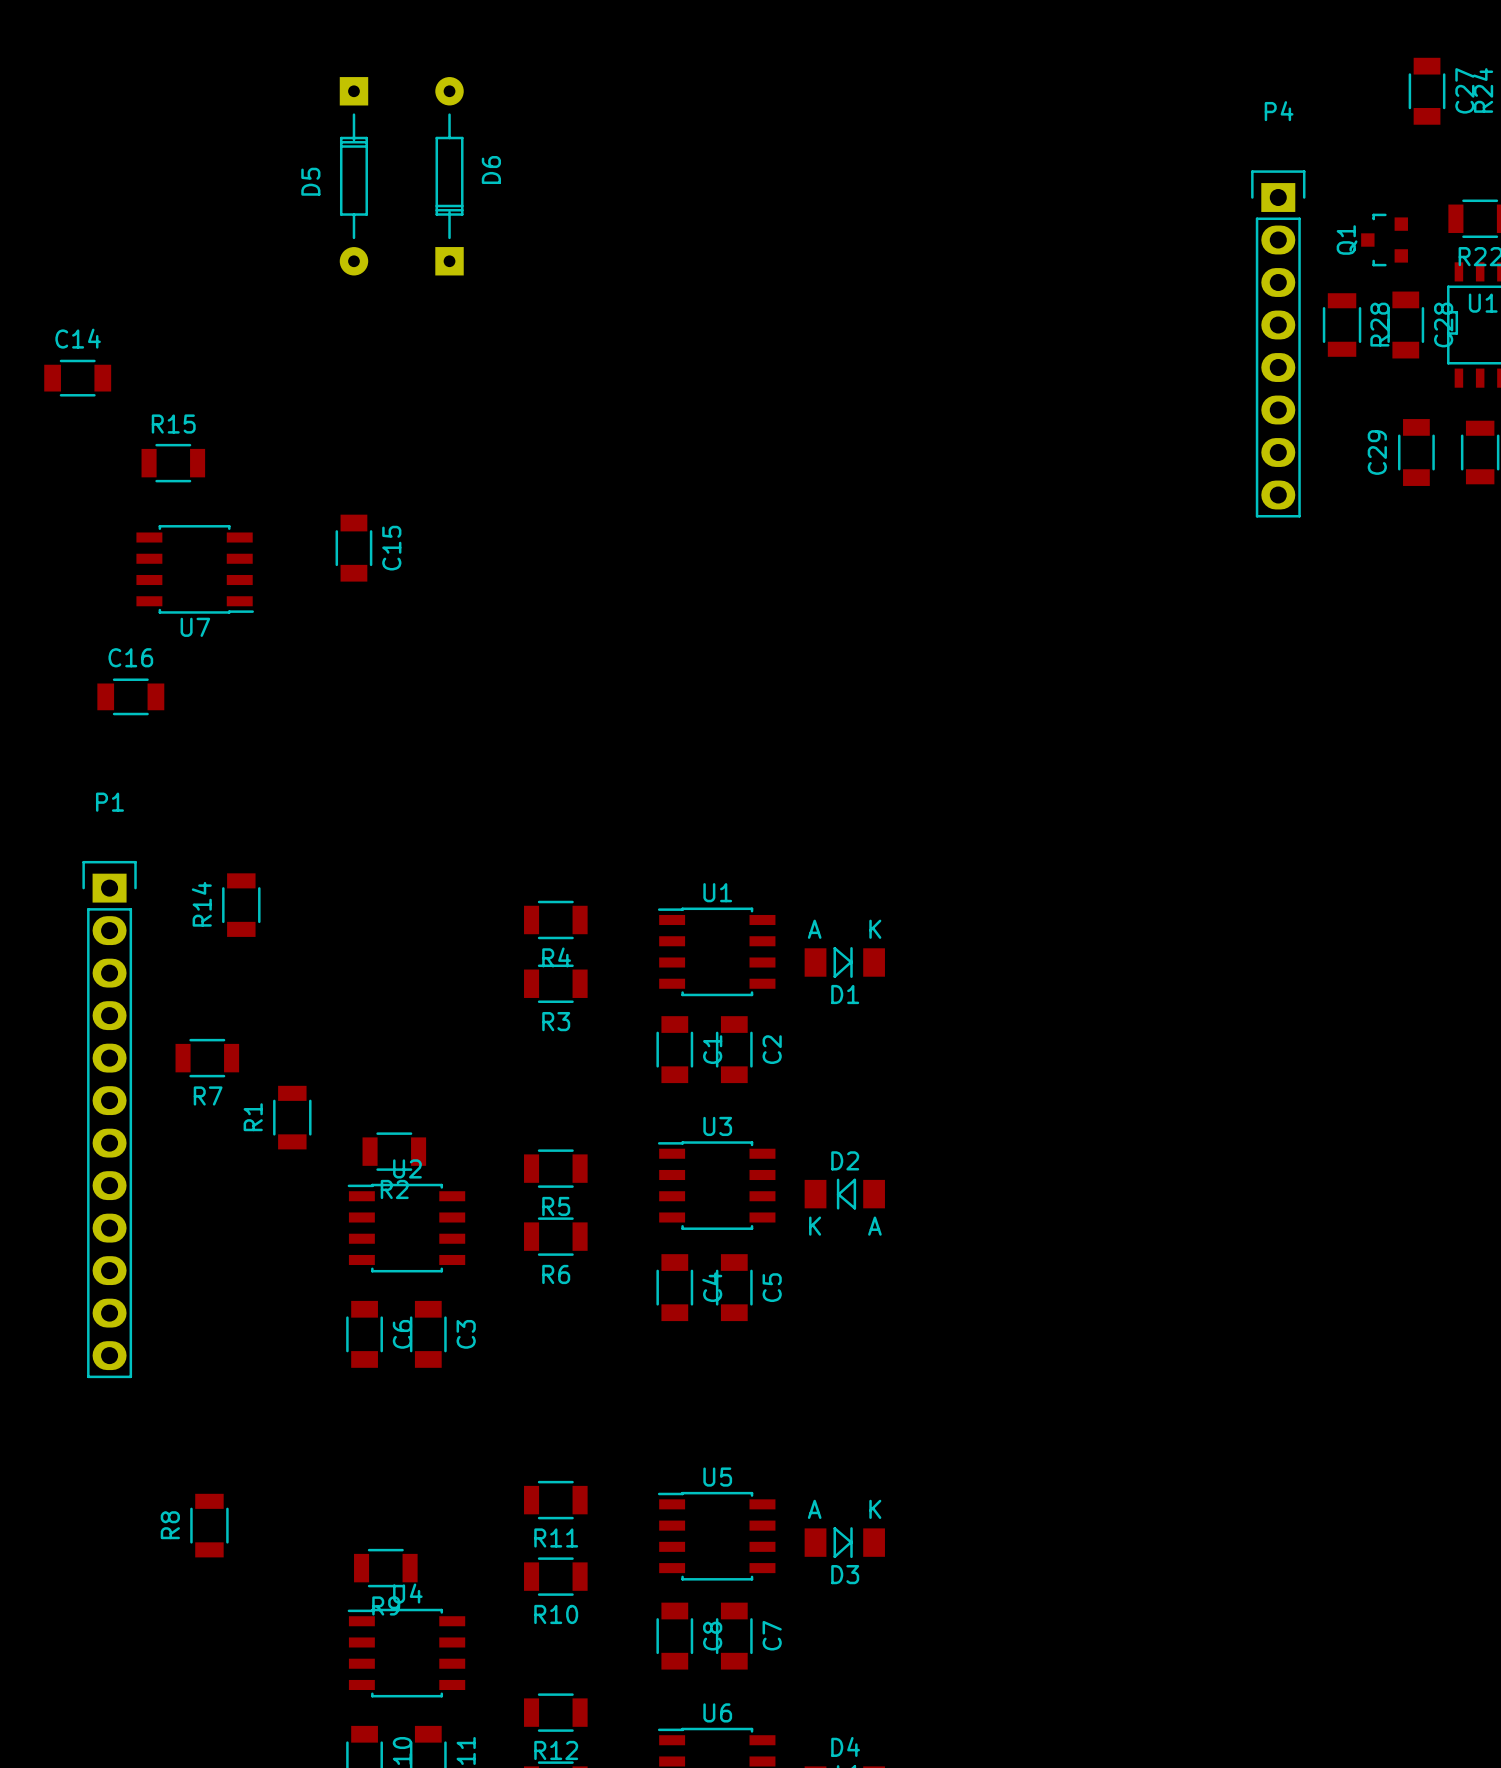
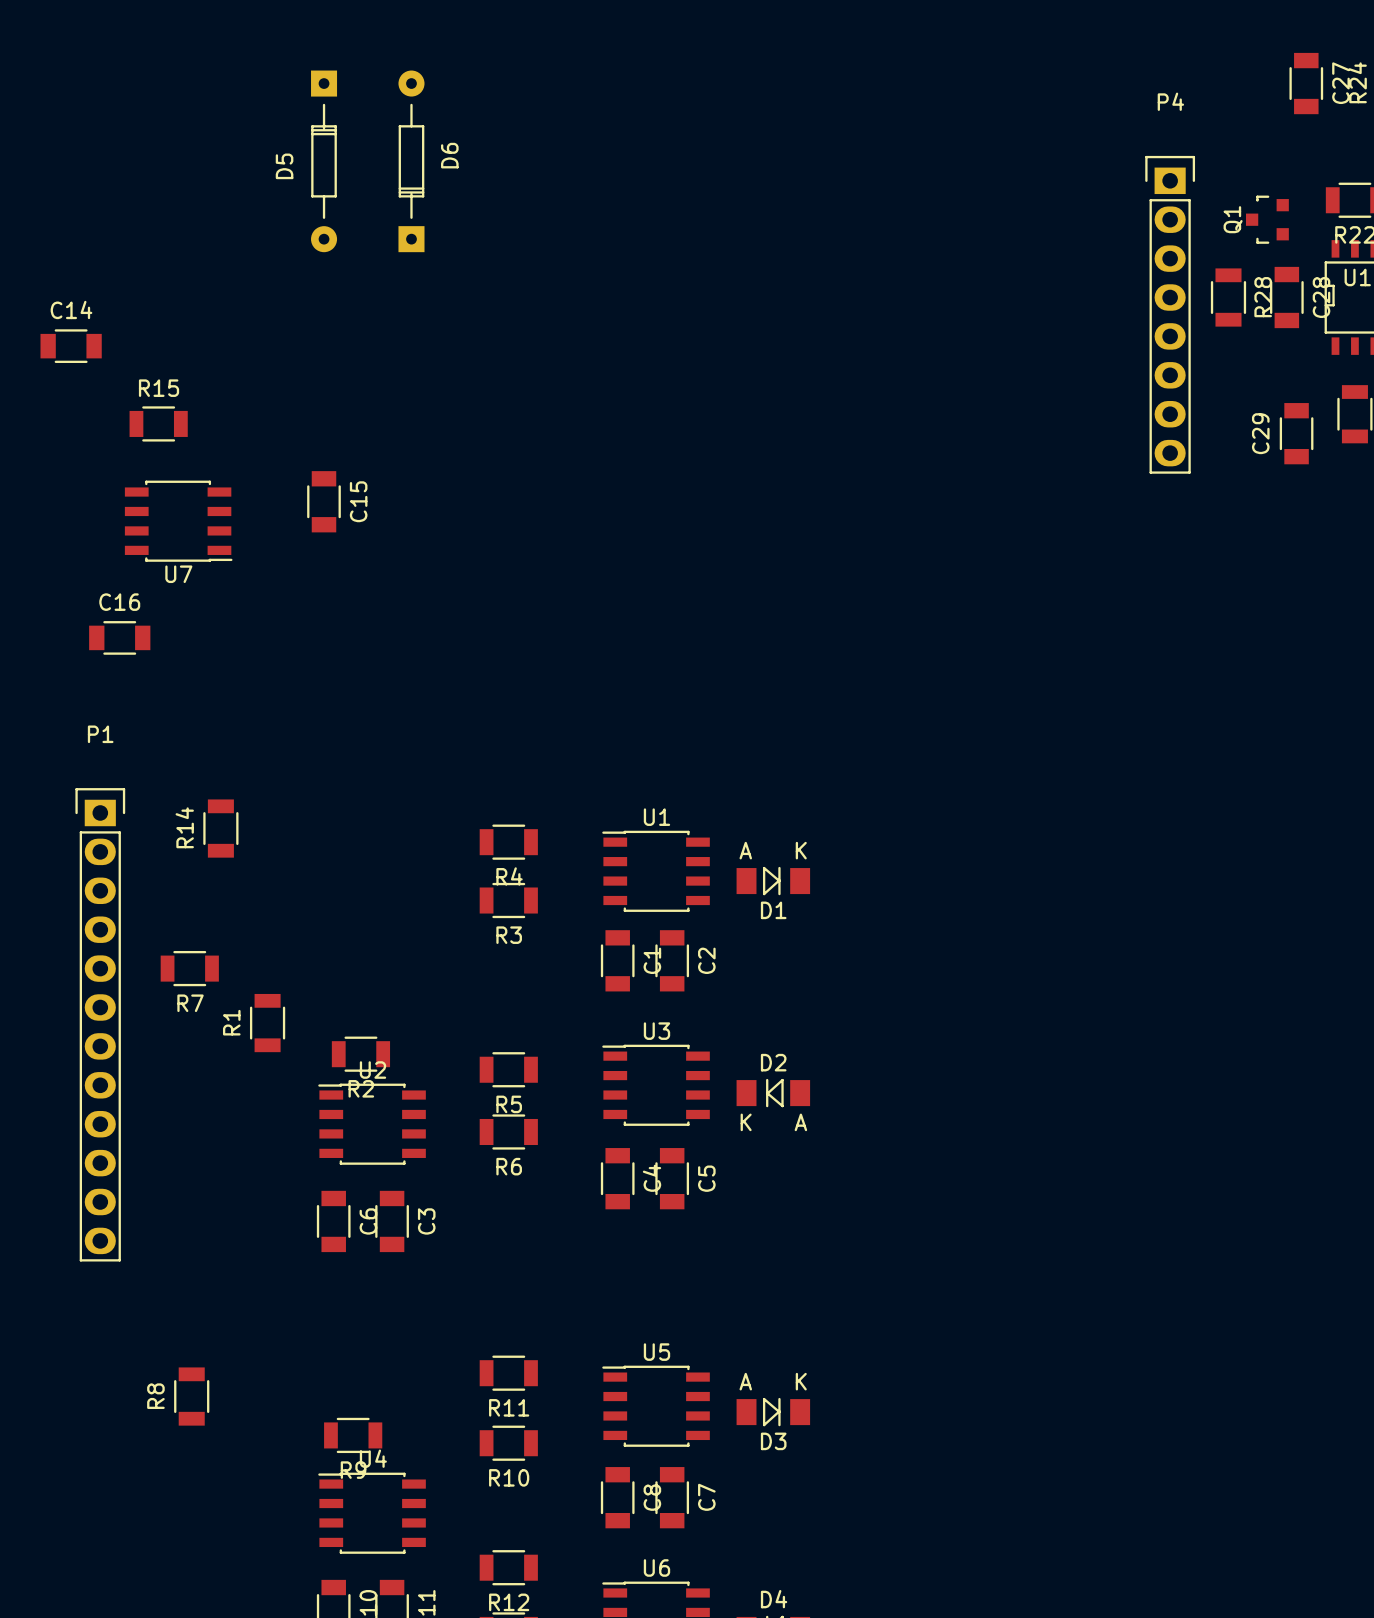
C29 position: (1416, 452) -> (1296, 433)

